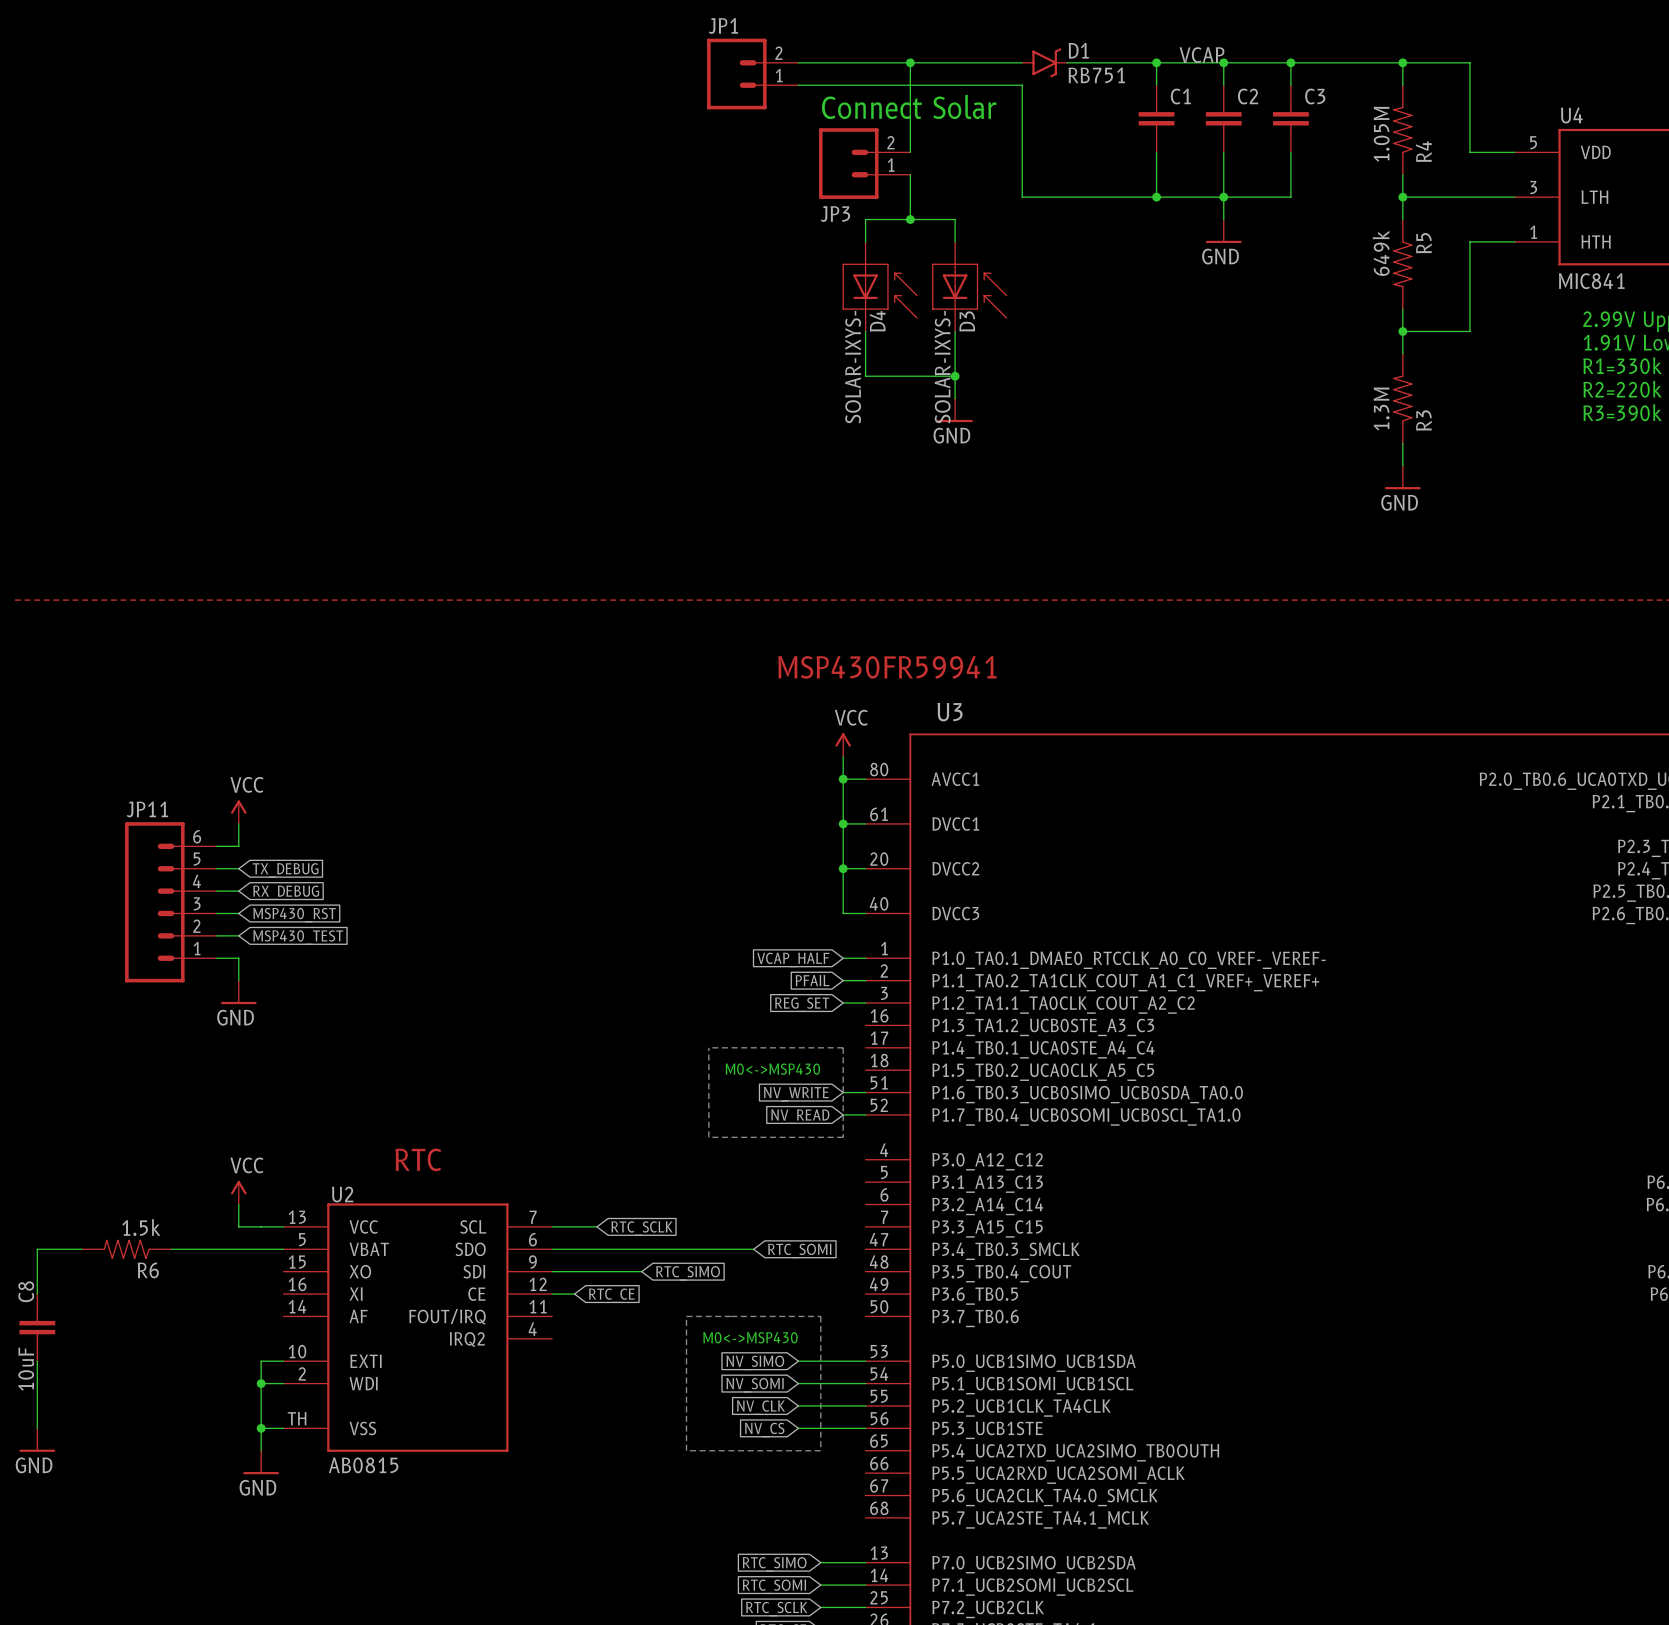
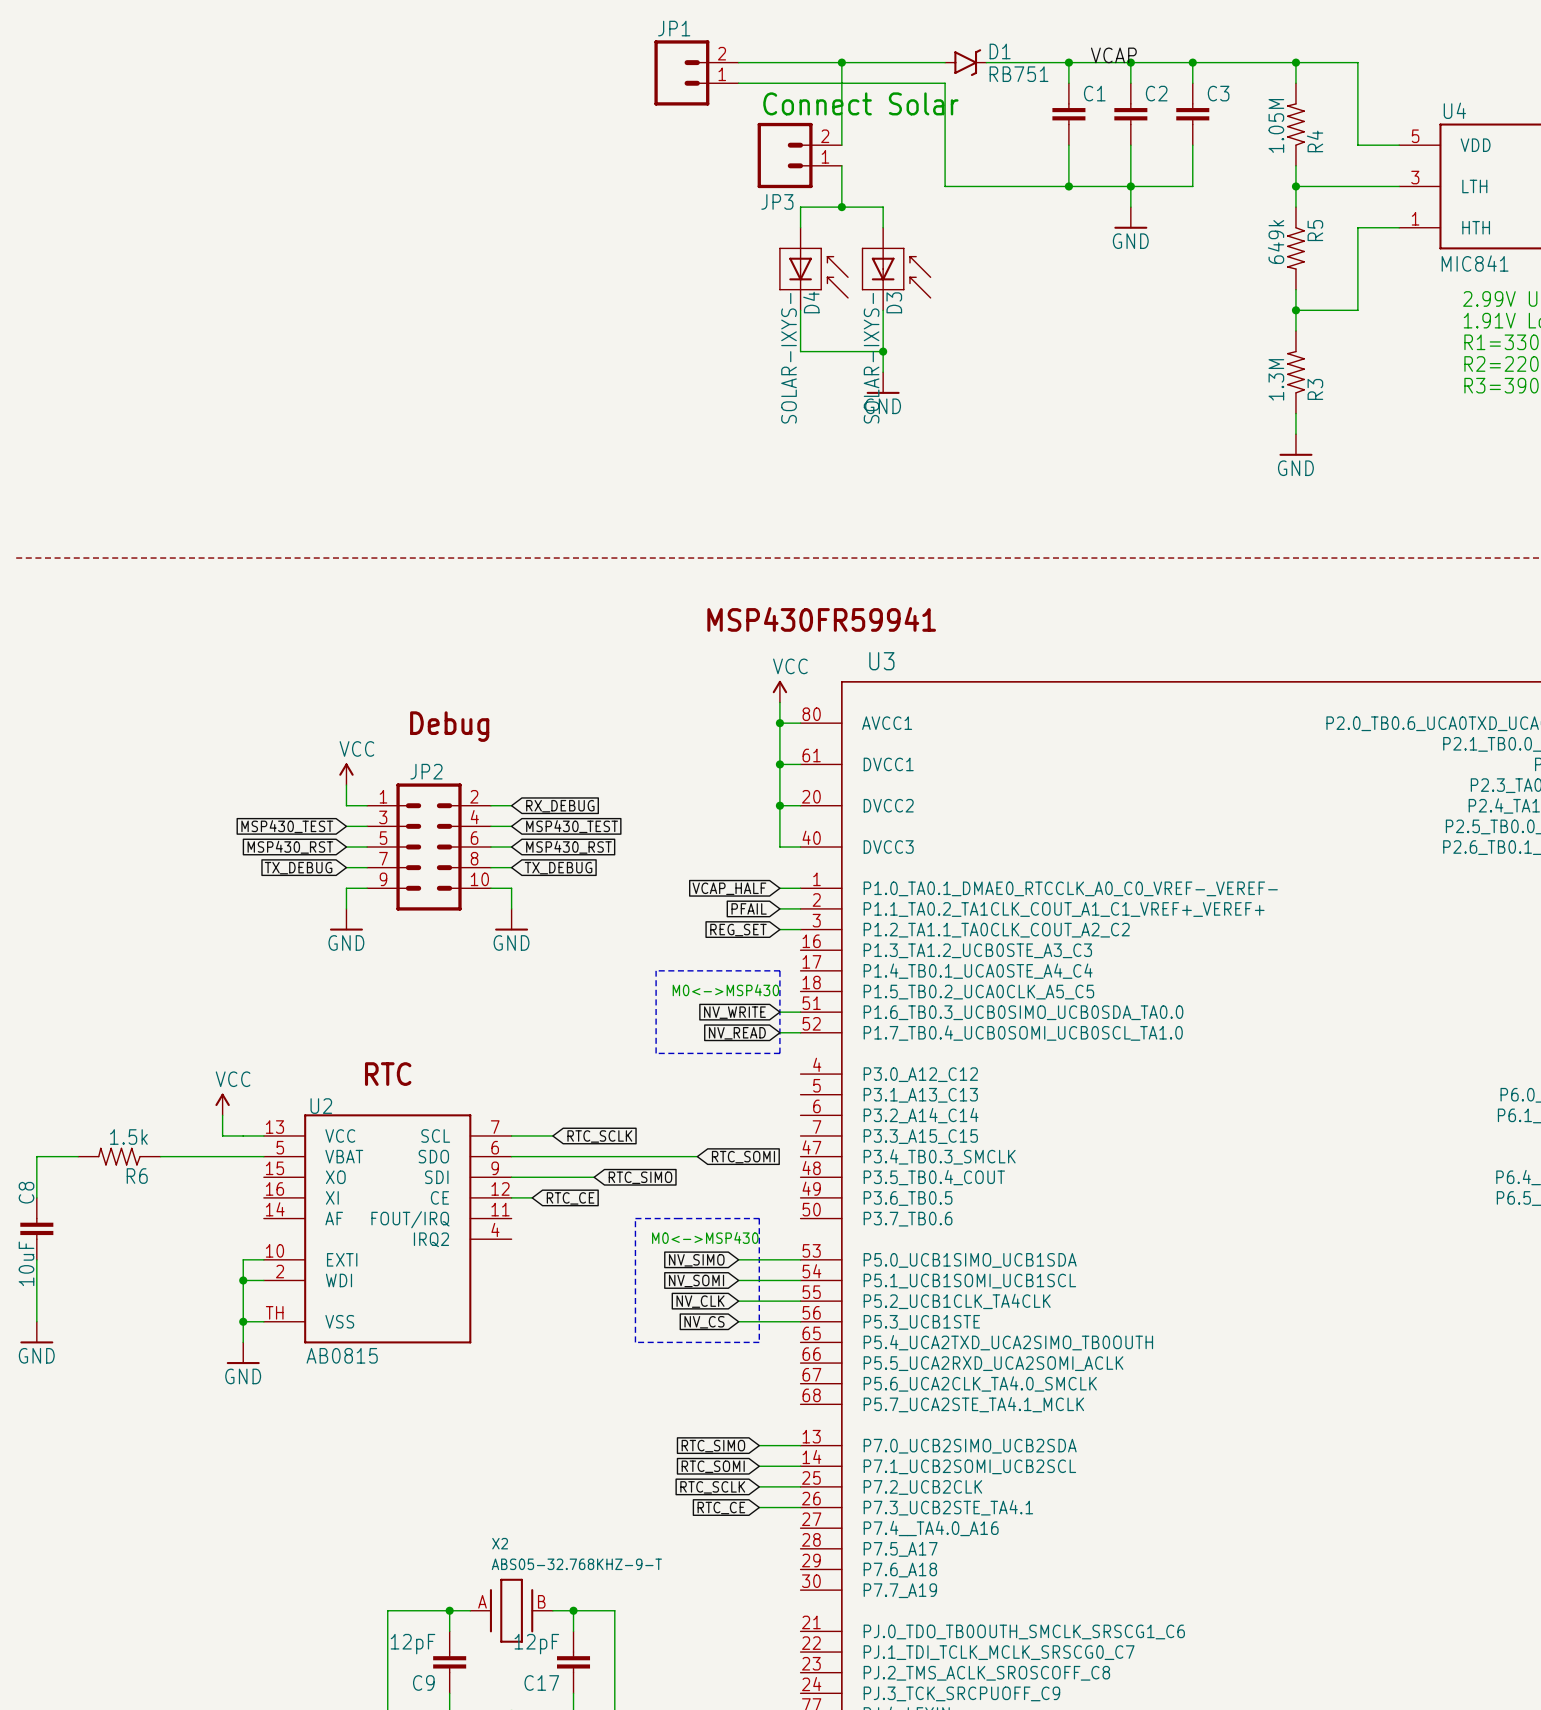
text: none -> Debug (449, 726)
power symbol position: VCC (238, 812) -> VCC (346, 774)
wire: (238, 823) (238, 846) (216, 846) -> none
wire: none -> (346, 785) (346, 805) (367, 805)
wire: (216, 868) (238, 868) -> none
wire: none -> (490, 805) (511, 805)
global label rotation: 0° (285, 870) -> 180° (298, 868)
global label: none -> RX_DEBUG (560, 806)
wire: (216, 891) (238, 891) -> (346, 826) (367, 826)
wire: none -> (490, 826) (511, 826)
global label: RX_DEBUG (286, 892) -> none
global label: none -> MSP430_TEST (572, 826)
JP11: (170, 902) -> none
wire: (216, 913) (238, 913) -> (346, 847) (367, 847)
JP2: none -> (429, 847)
wire: none -> (490, 847) (511, 847)
global label rotation: 0° (294, 915) -> 180° (290, 847)
global label: none -> MSP430_RST (568, 847)
wire: (216, 935) (238, 935) -> (346, 867) (367, 867)
wire: none -> (490, 867) (511, 867)
global label rotation: 0° (298, 937) -> 180° (287, 826)
global label: none -> TX_DEBUG (558, 868)
wire: (216, 958) (238, 958) (238, 980) -> none
wire: none -> (367, 888) (346, 888) (346, 908)
wire: none -> (490, 888) (511, 888) (511, 908)
power symbol position: GND (238, 992) -> GND (346, 919)
power symbol: none -> GND (511, 919)

